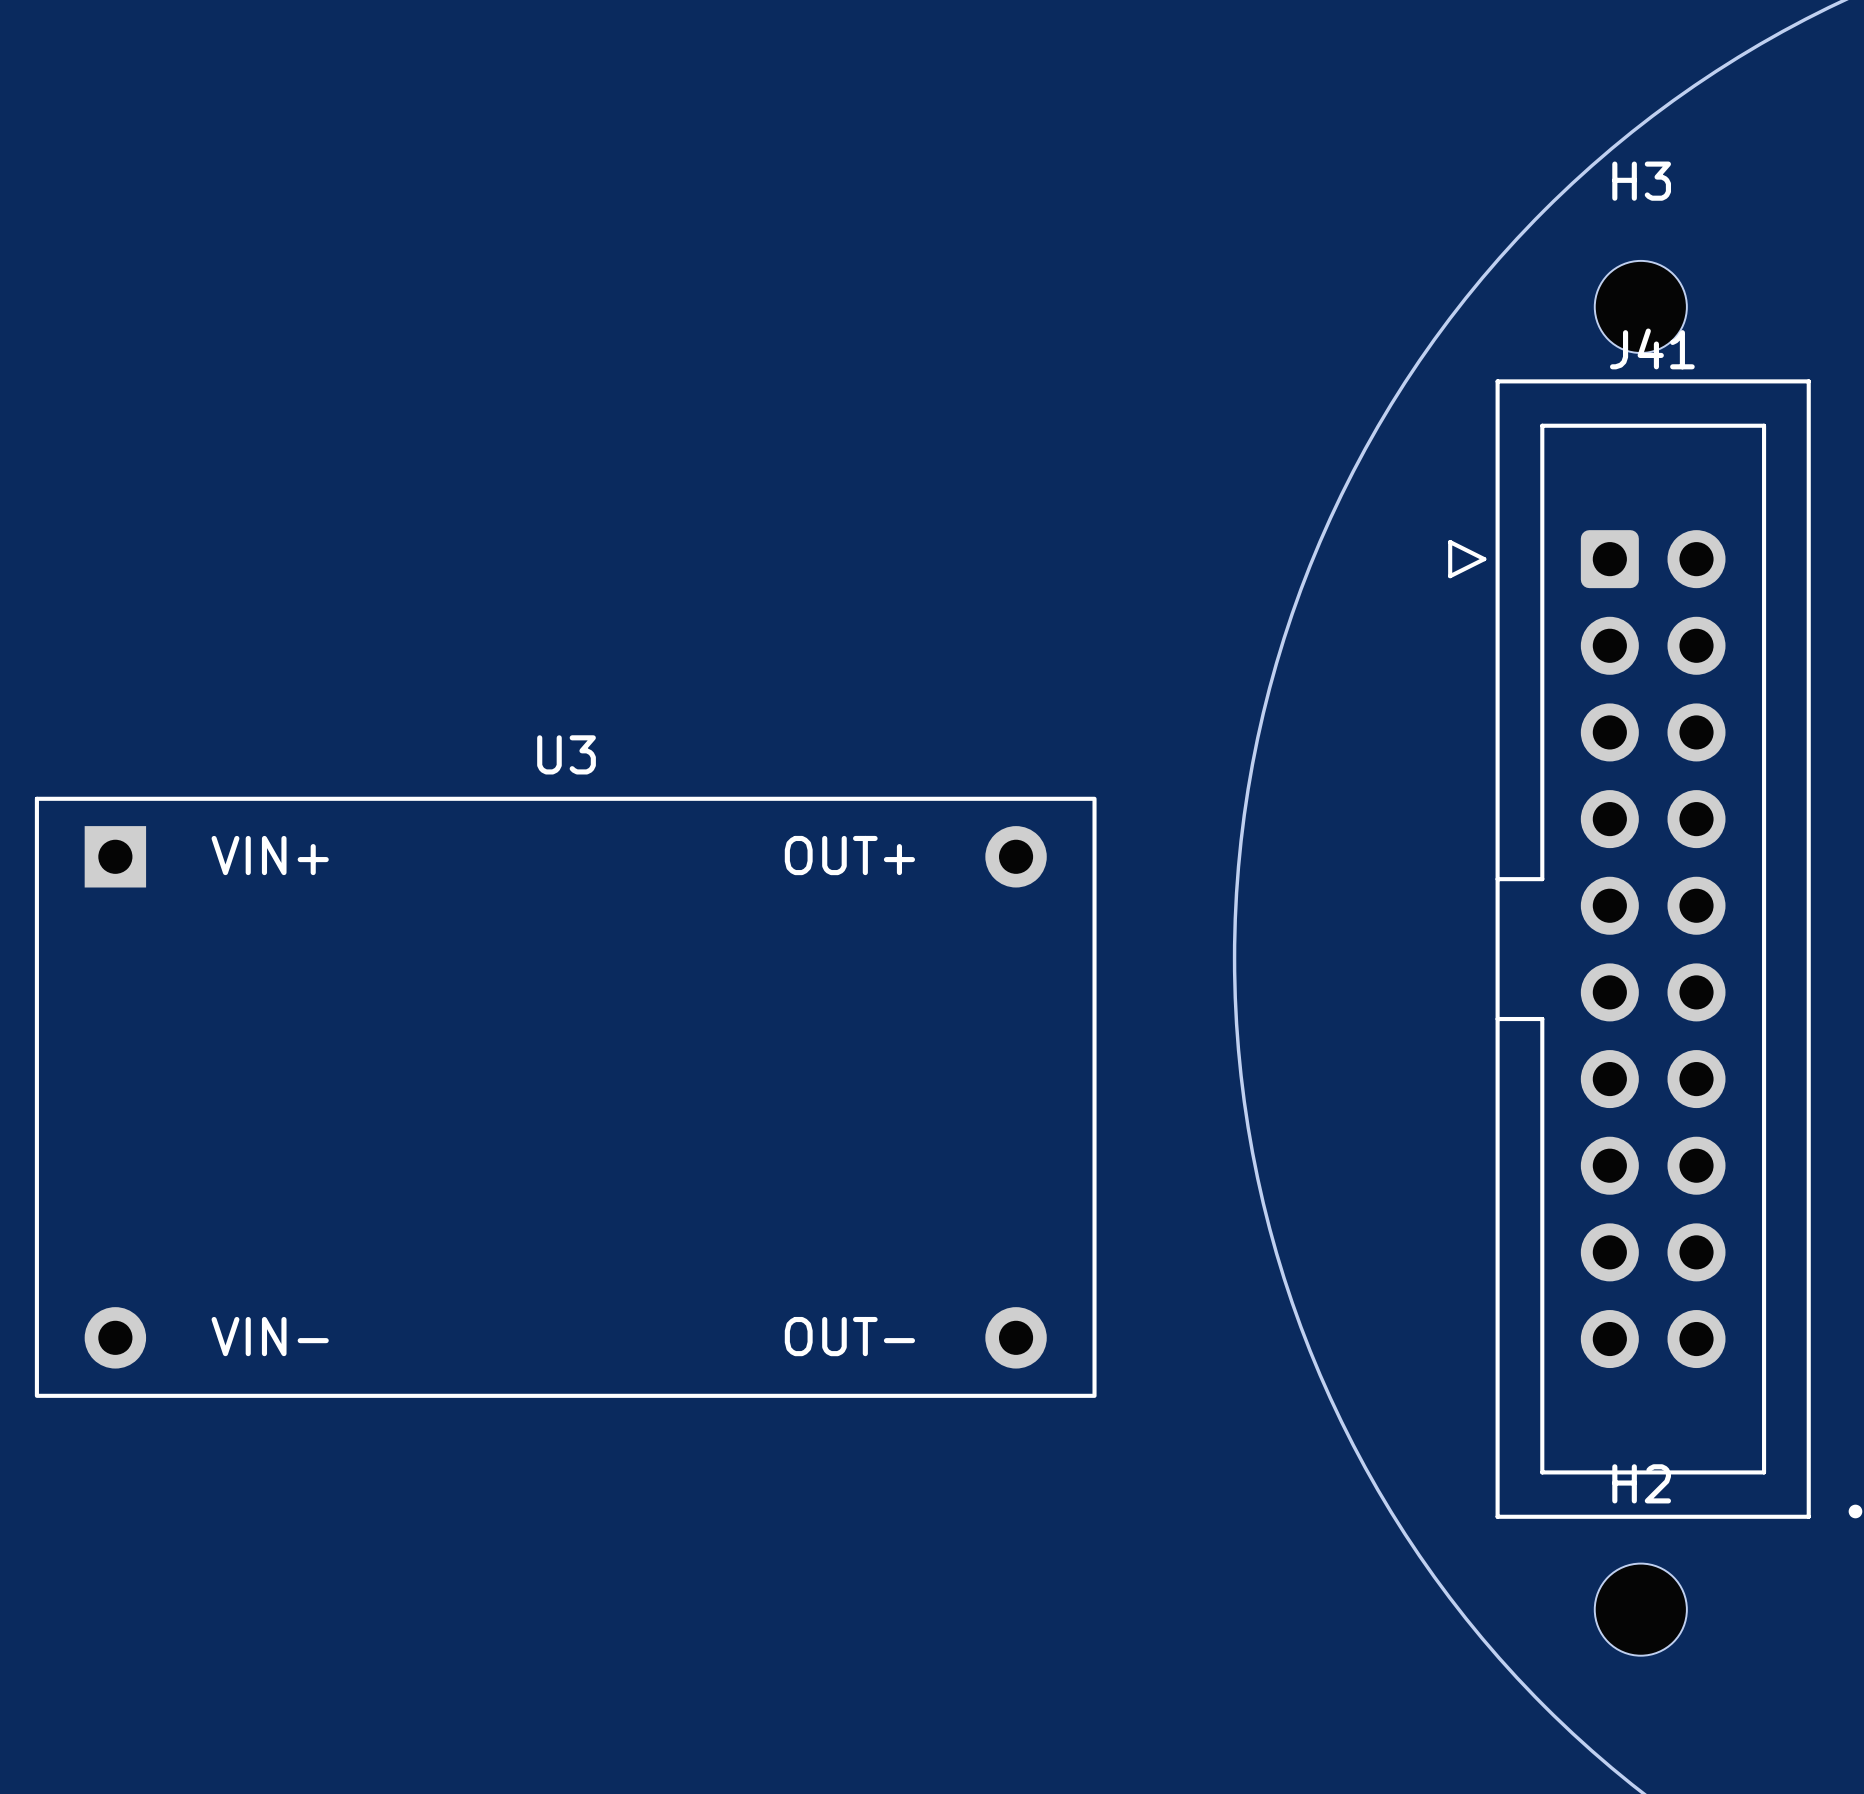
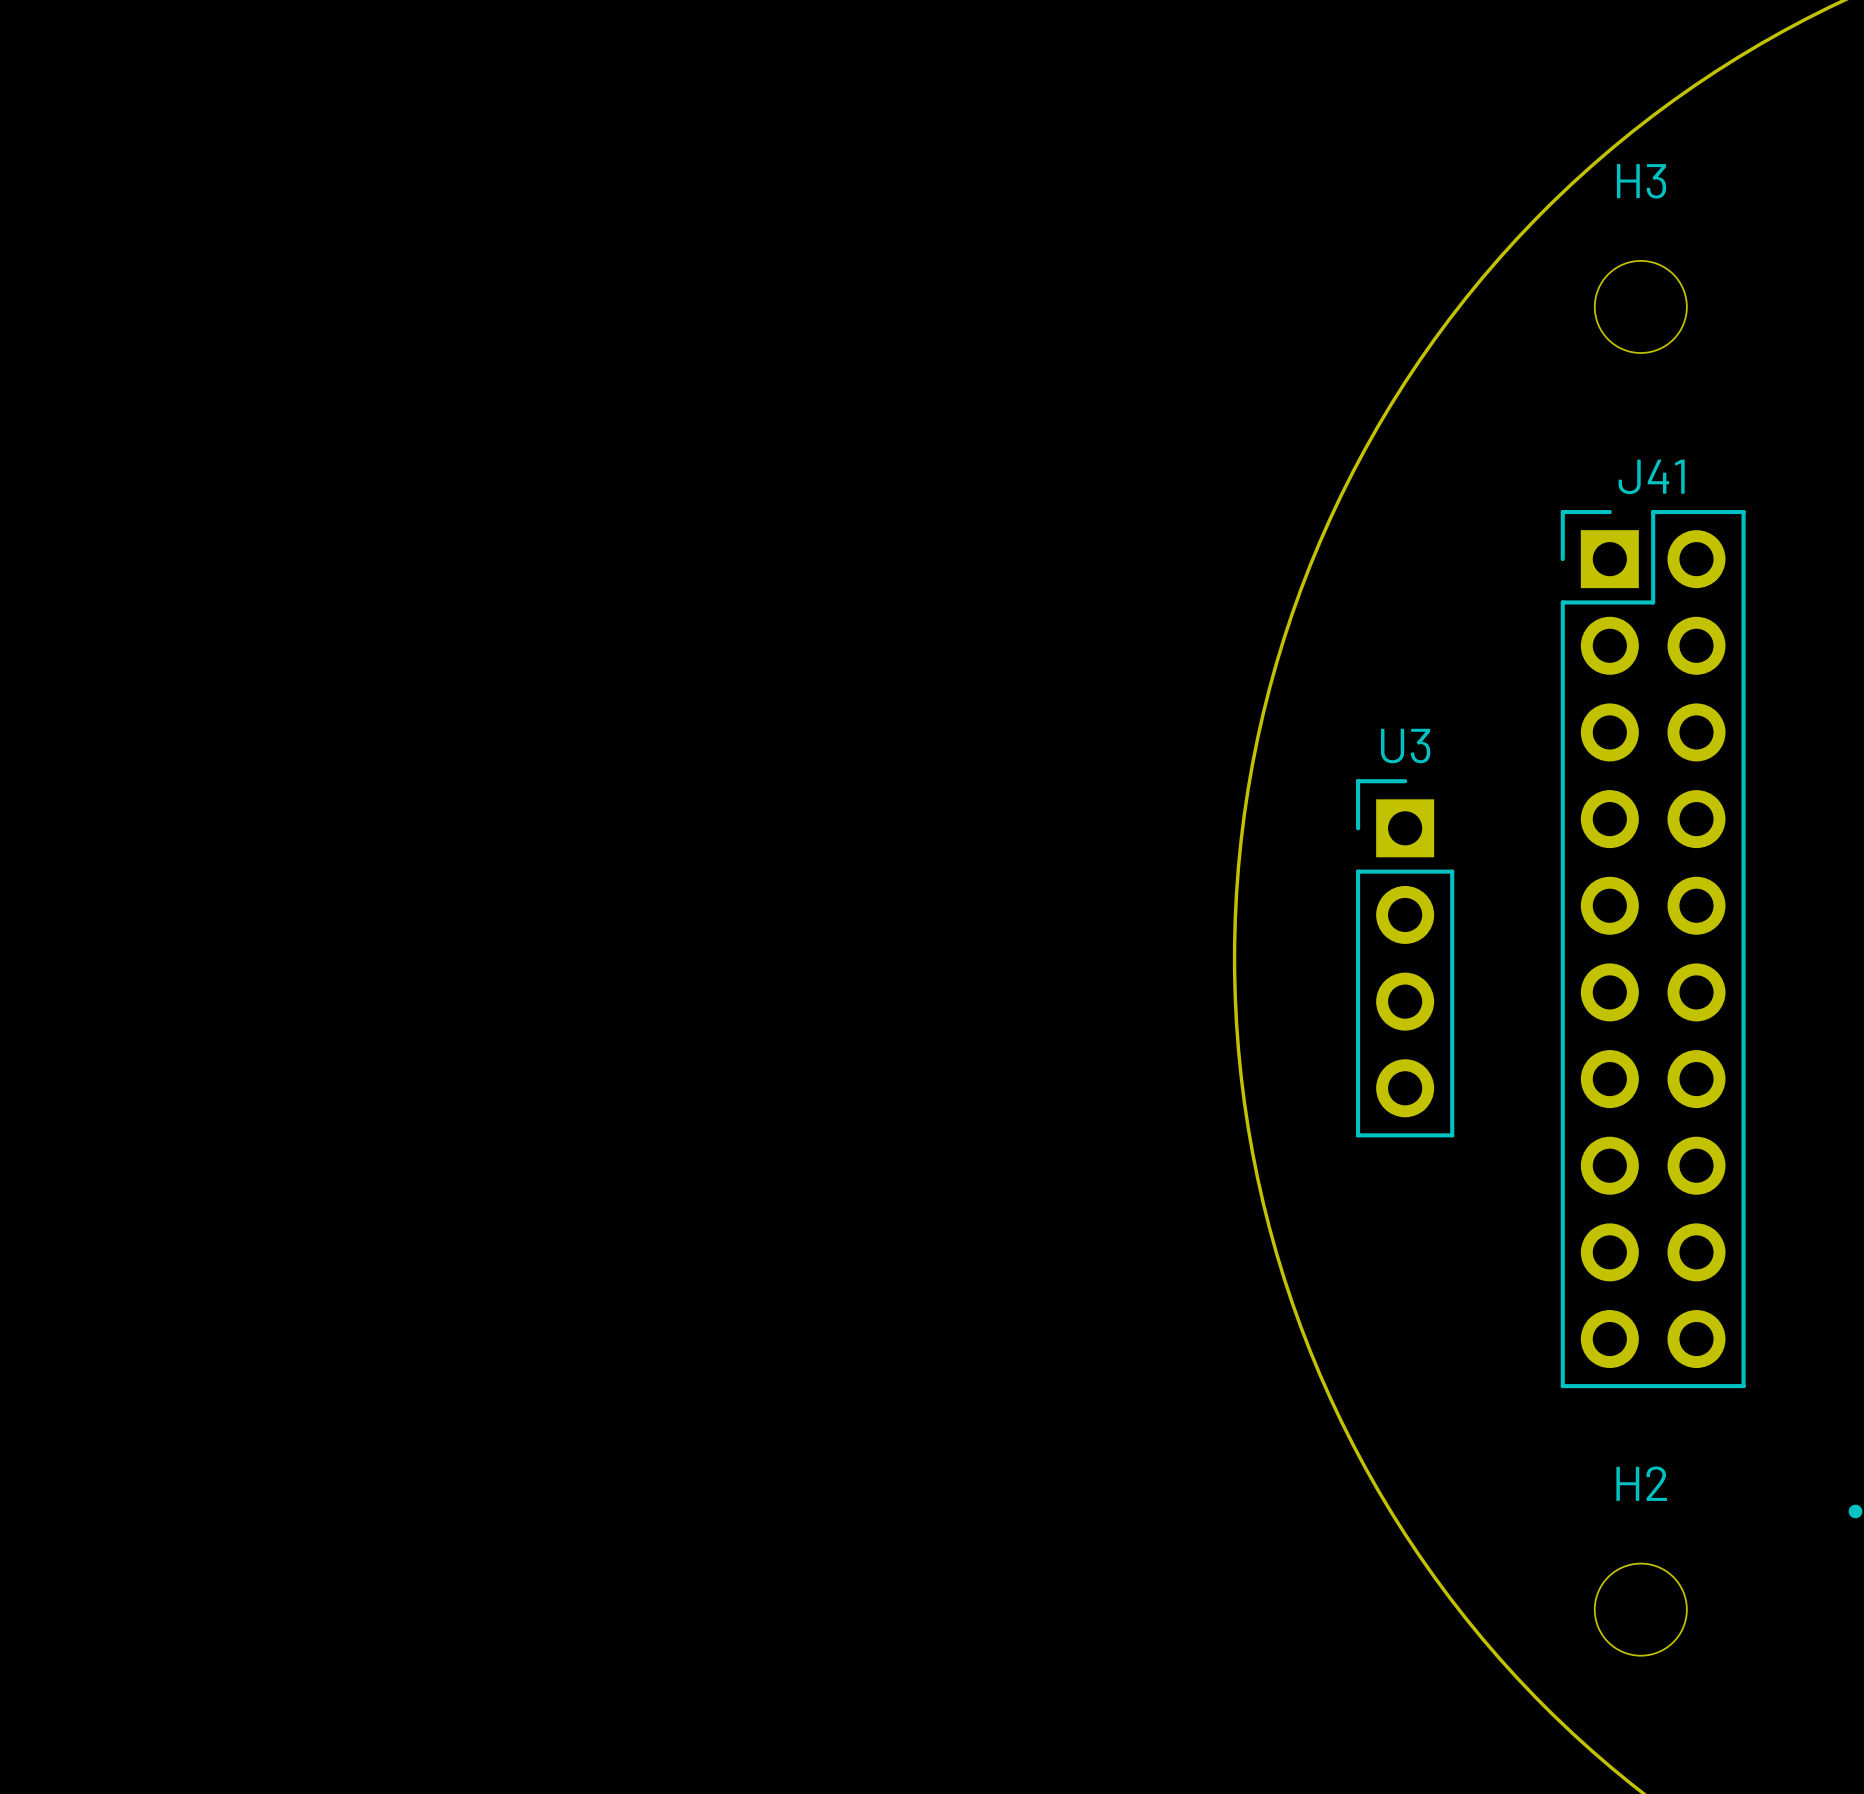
J41 name position: J41 (1652, 348) -> J41 (1651, 476)
J41 footprint: [1448, 379, 1811, 1519] -> [1560, 510, 1746, 1389]
U3 name position: U3 (566, 754) -> U3 (1405, 746)
U3 footprint: [34, 796, 1097, 1398] -> [1356, 779, 1455, 1138]

